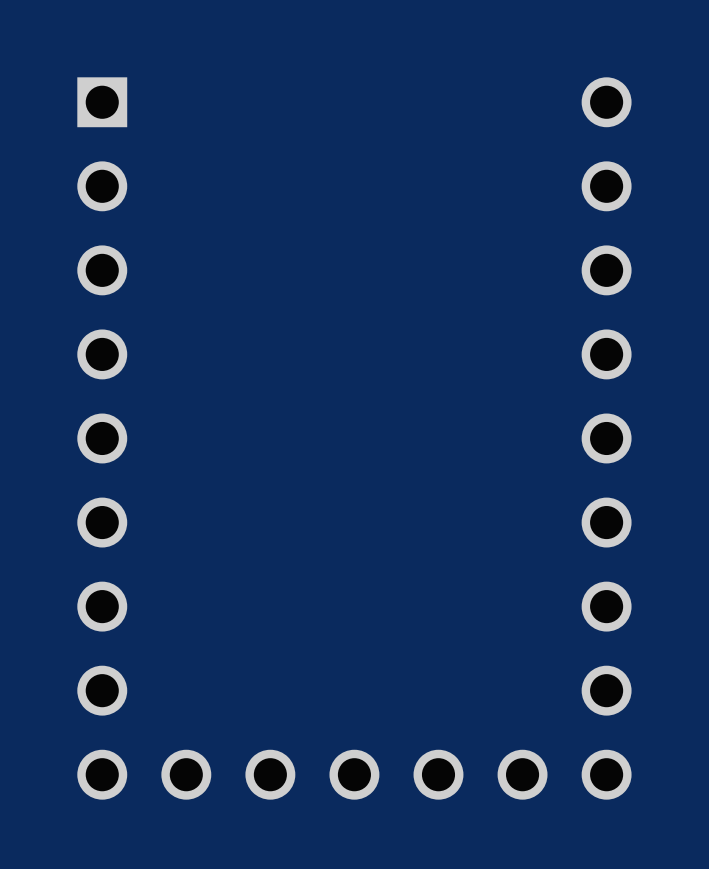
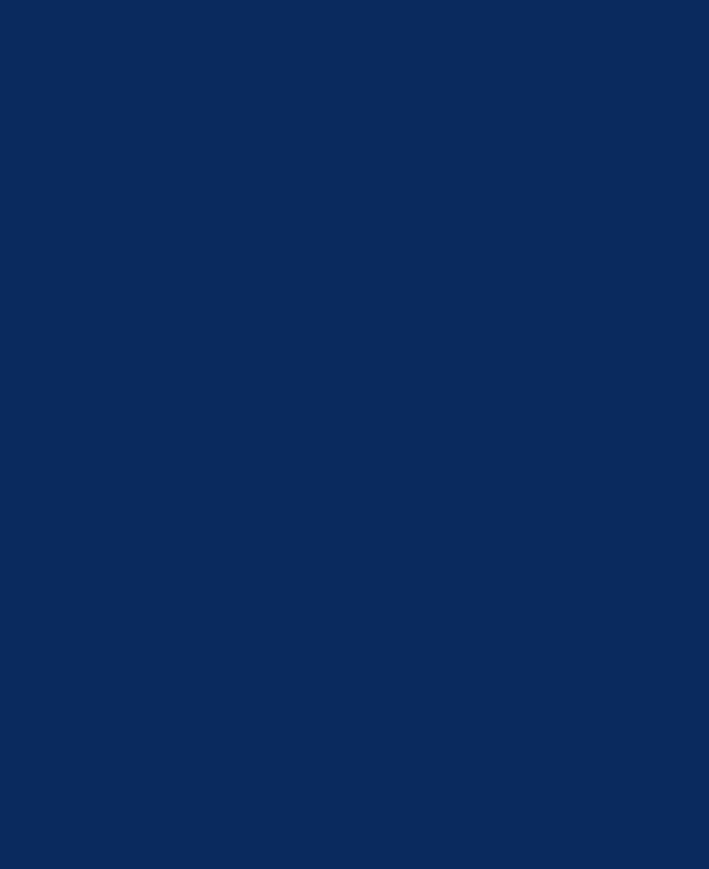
part: (354, 438) -> none

